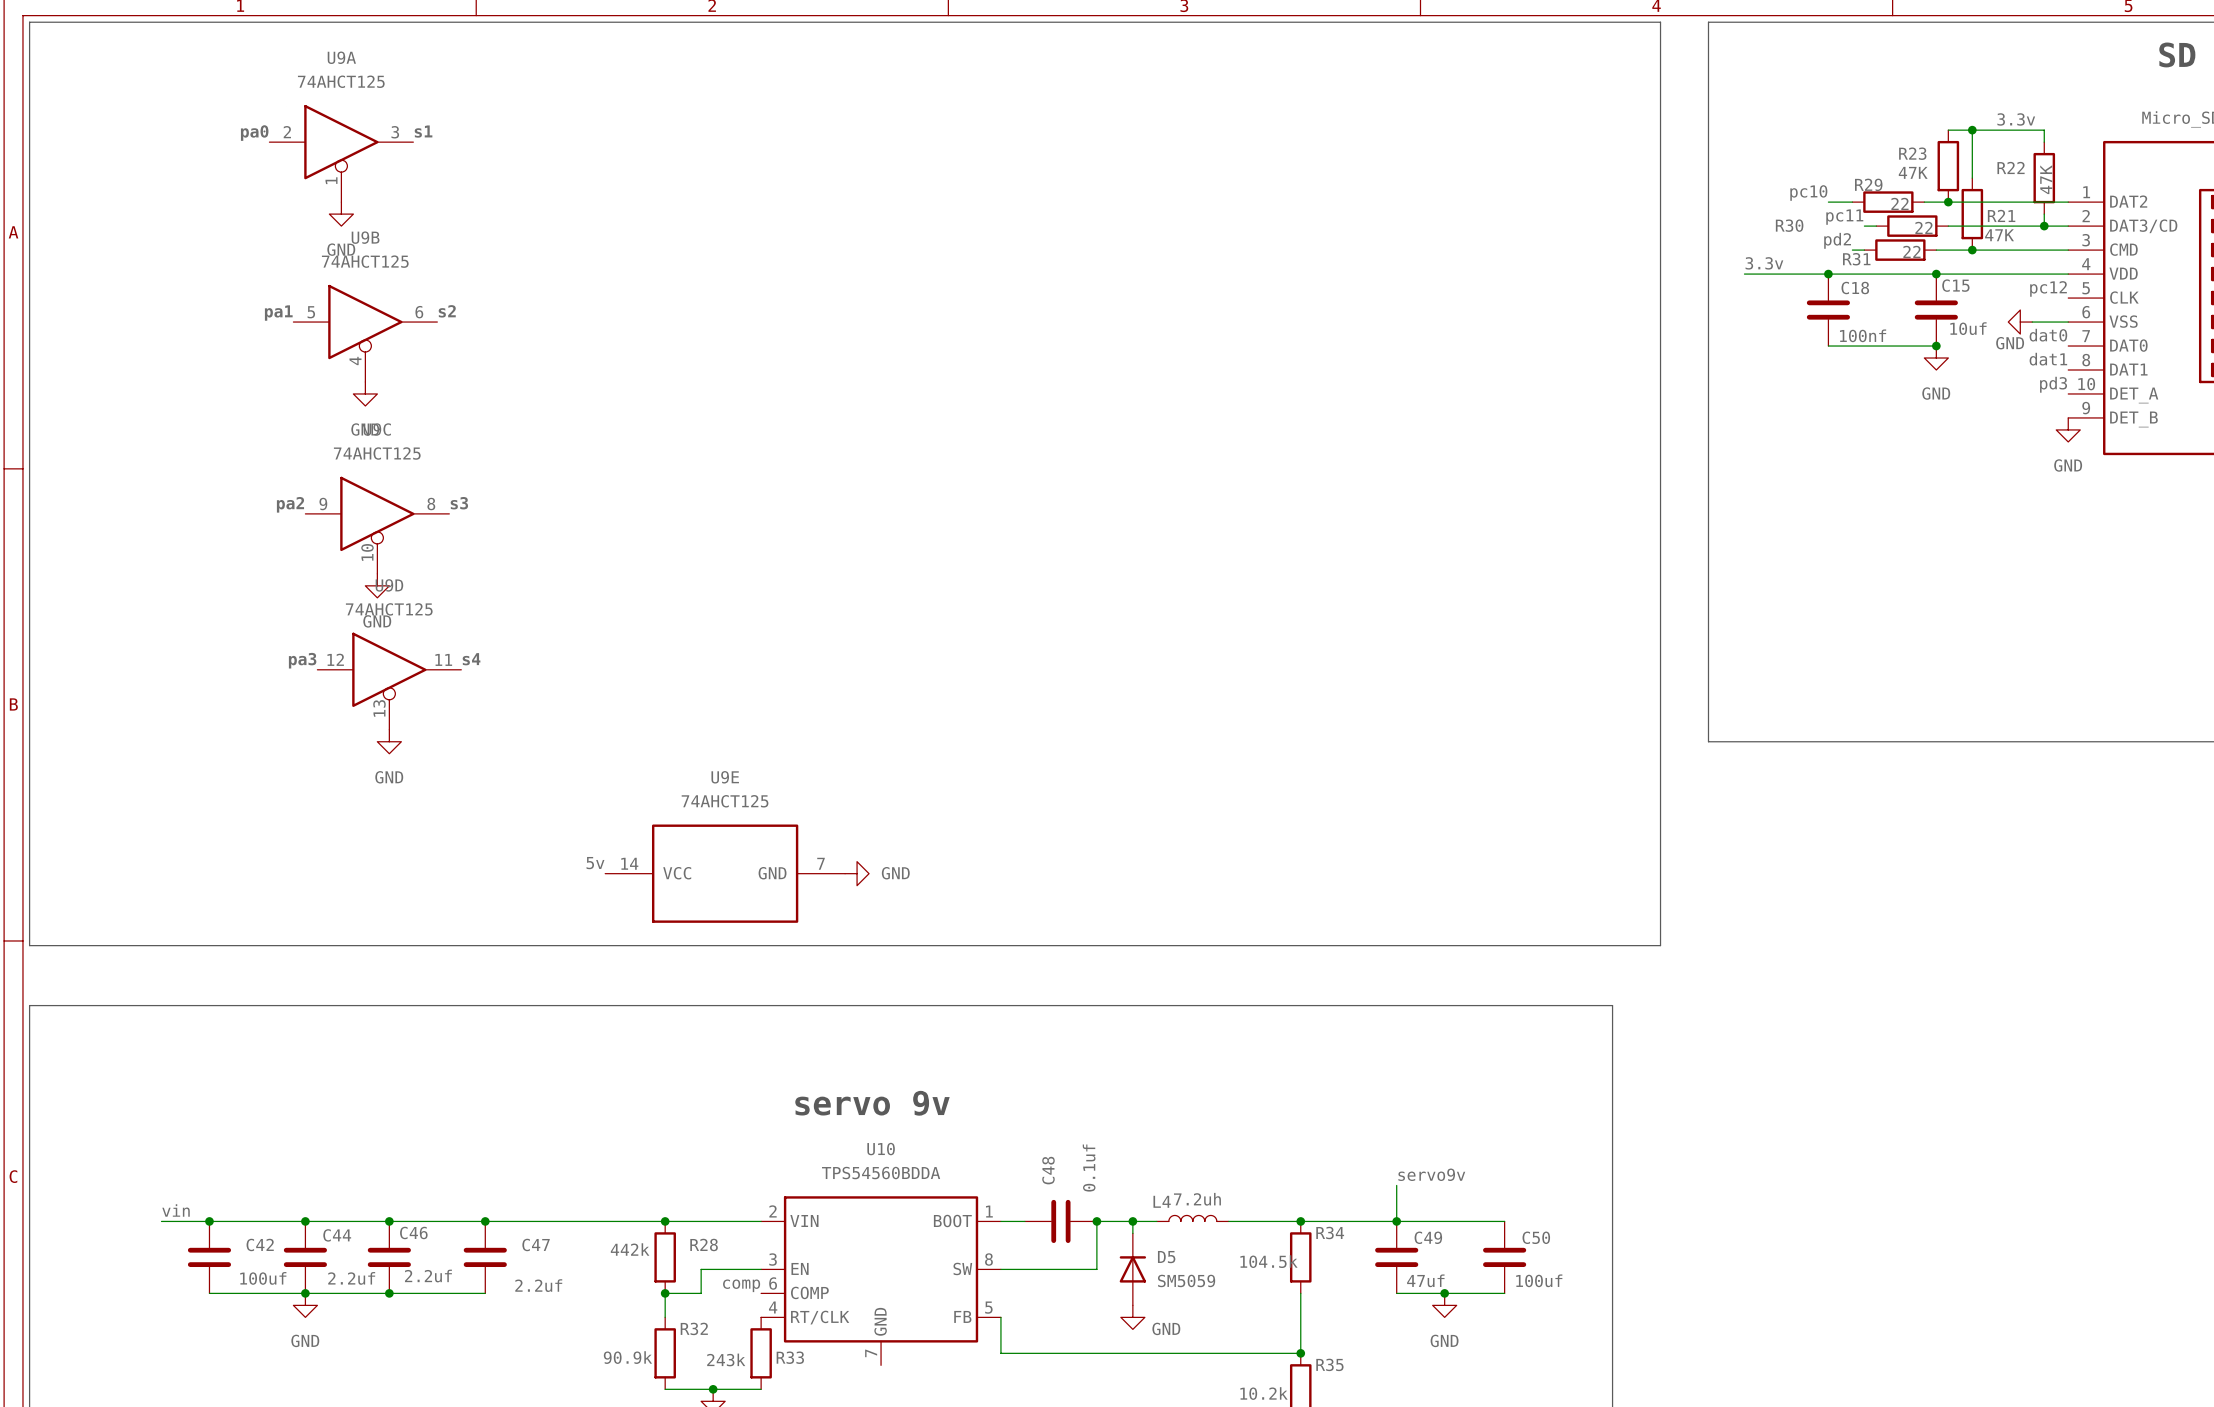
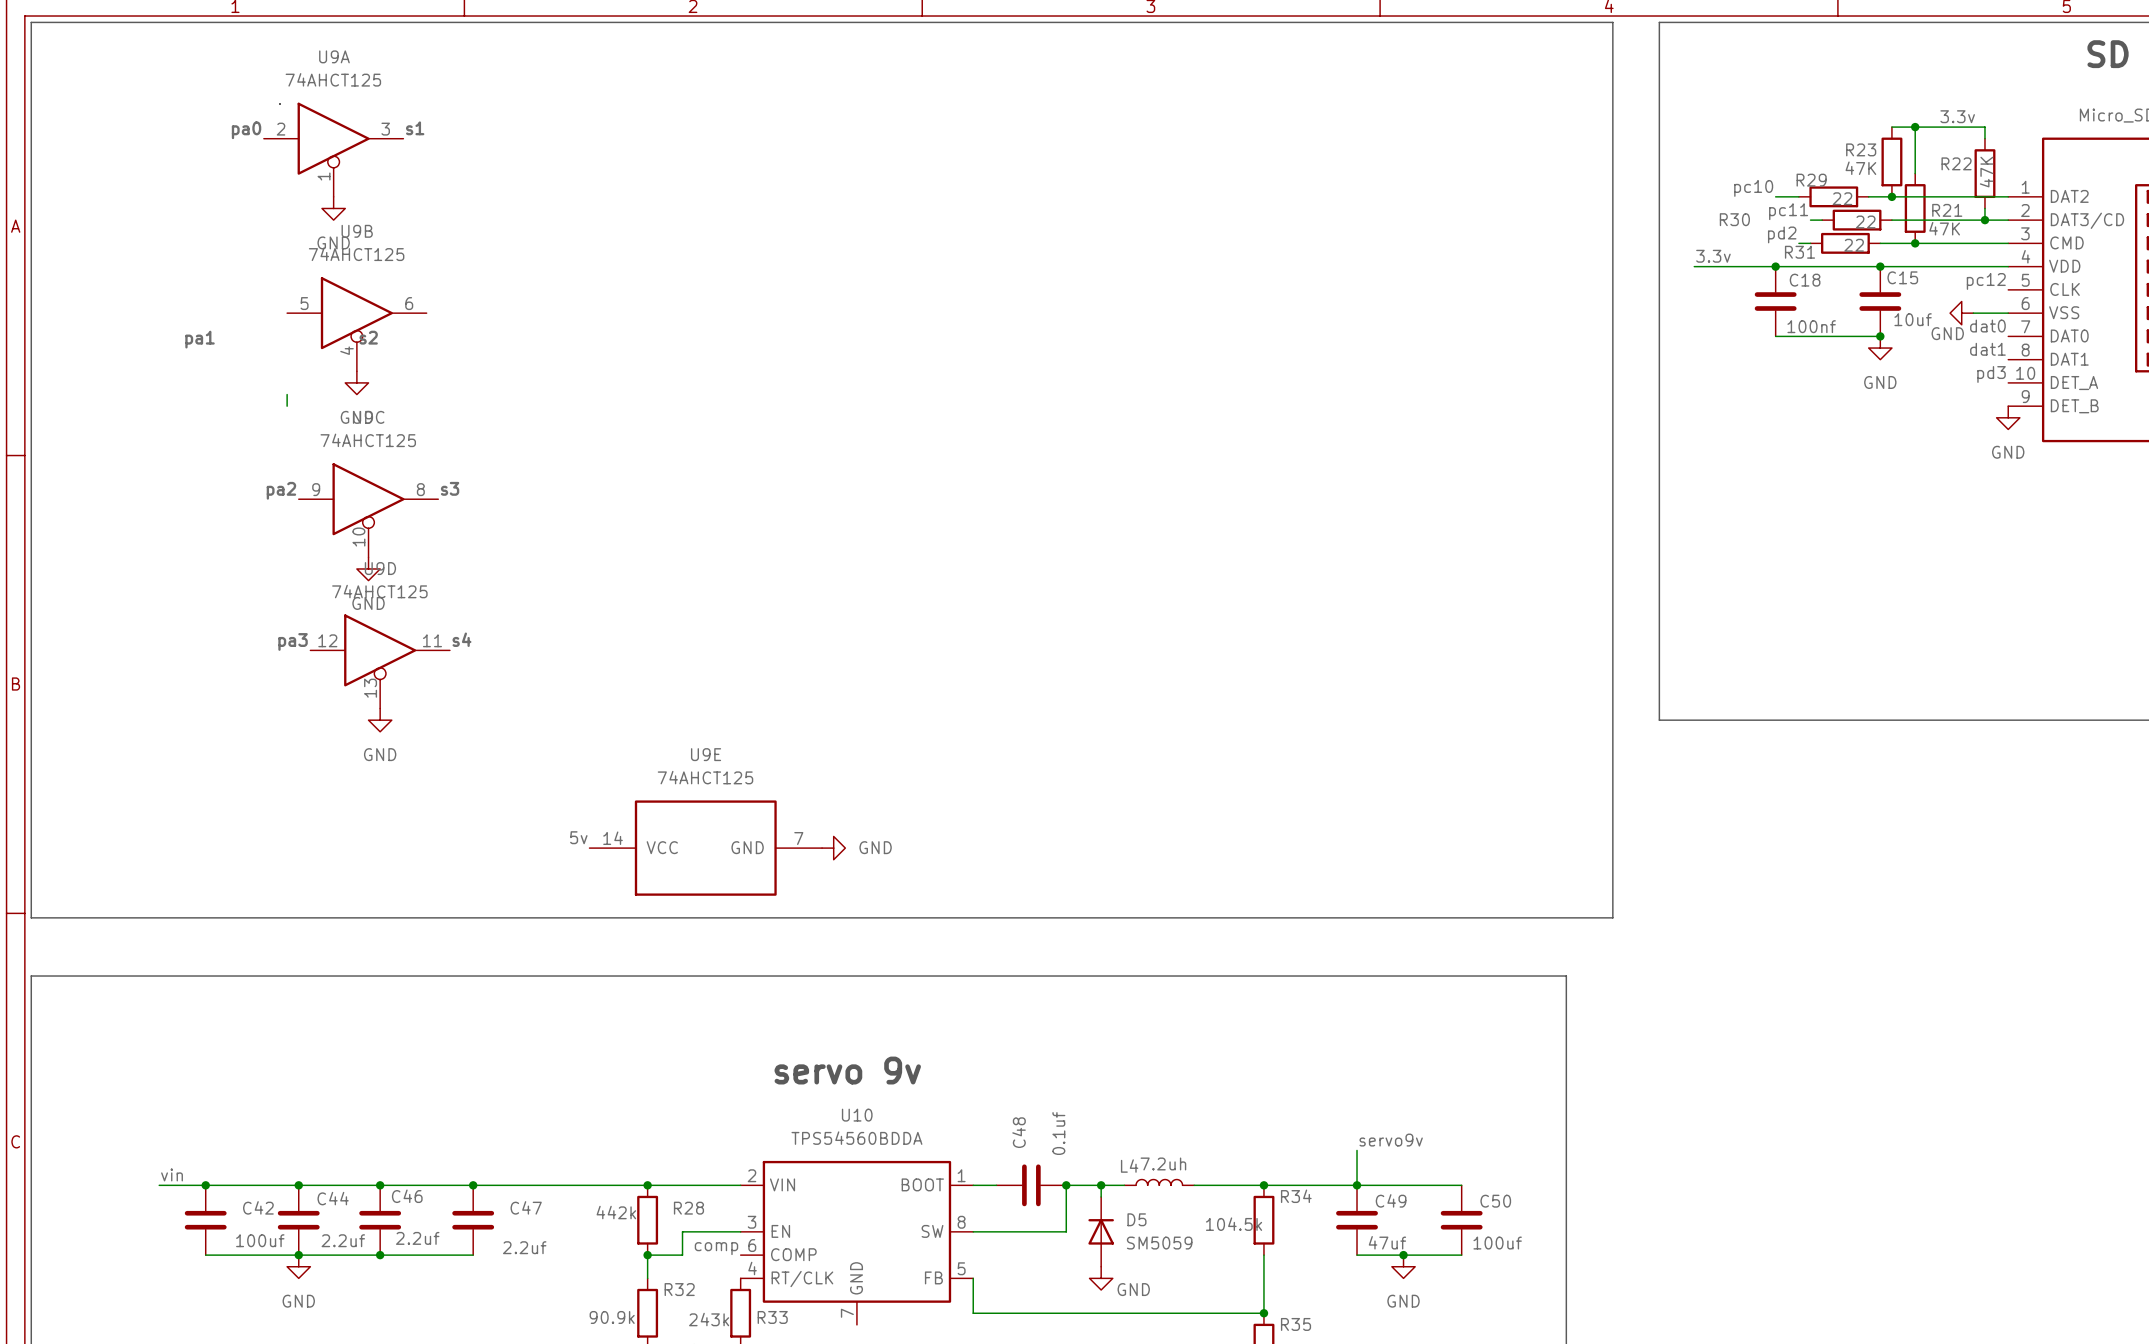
label position: s2 (447, 311) -> s2 (368, 337)
label position: pa1 (278, 313) -> pa1 (200, 339)
wire: none -> (287, 394) (287, 406)

